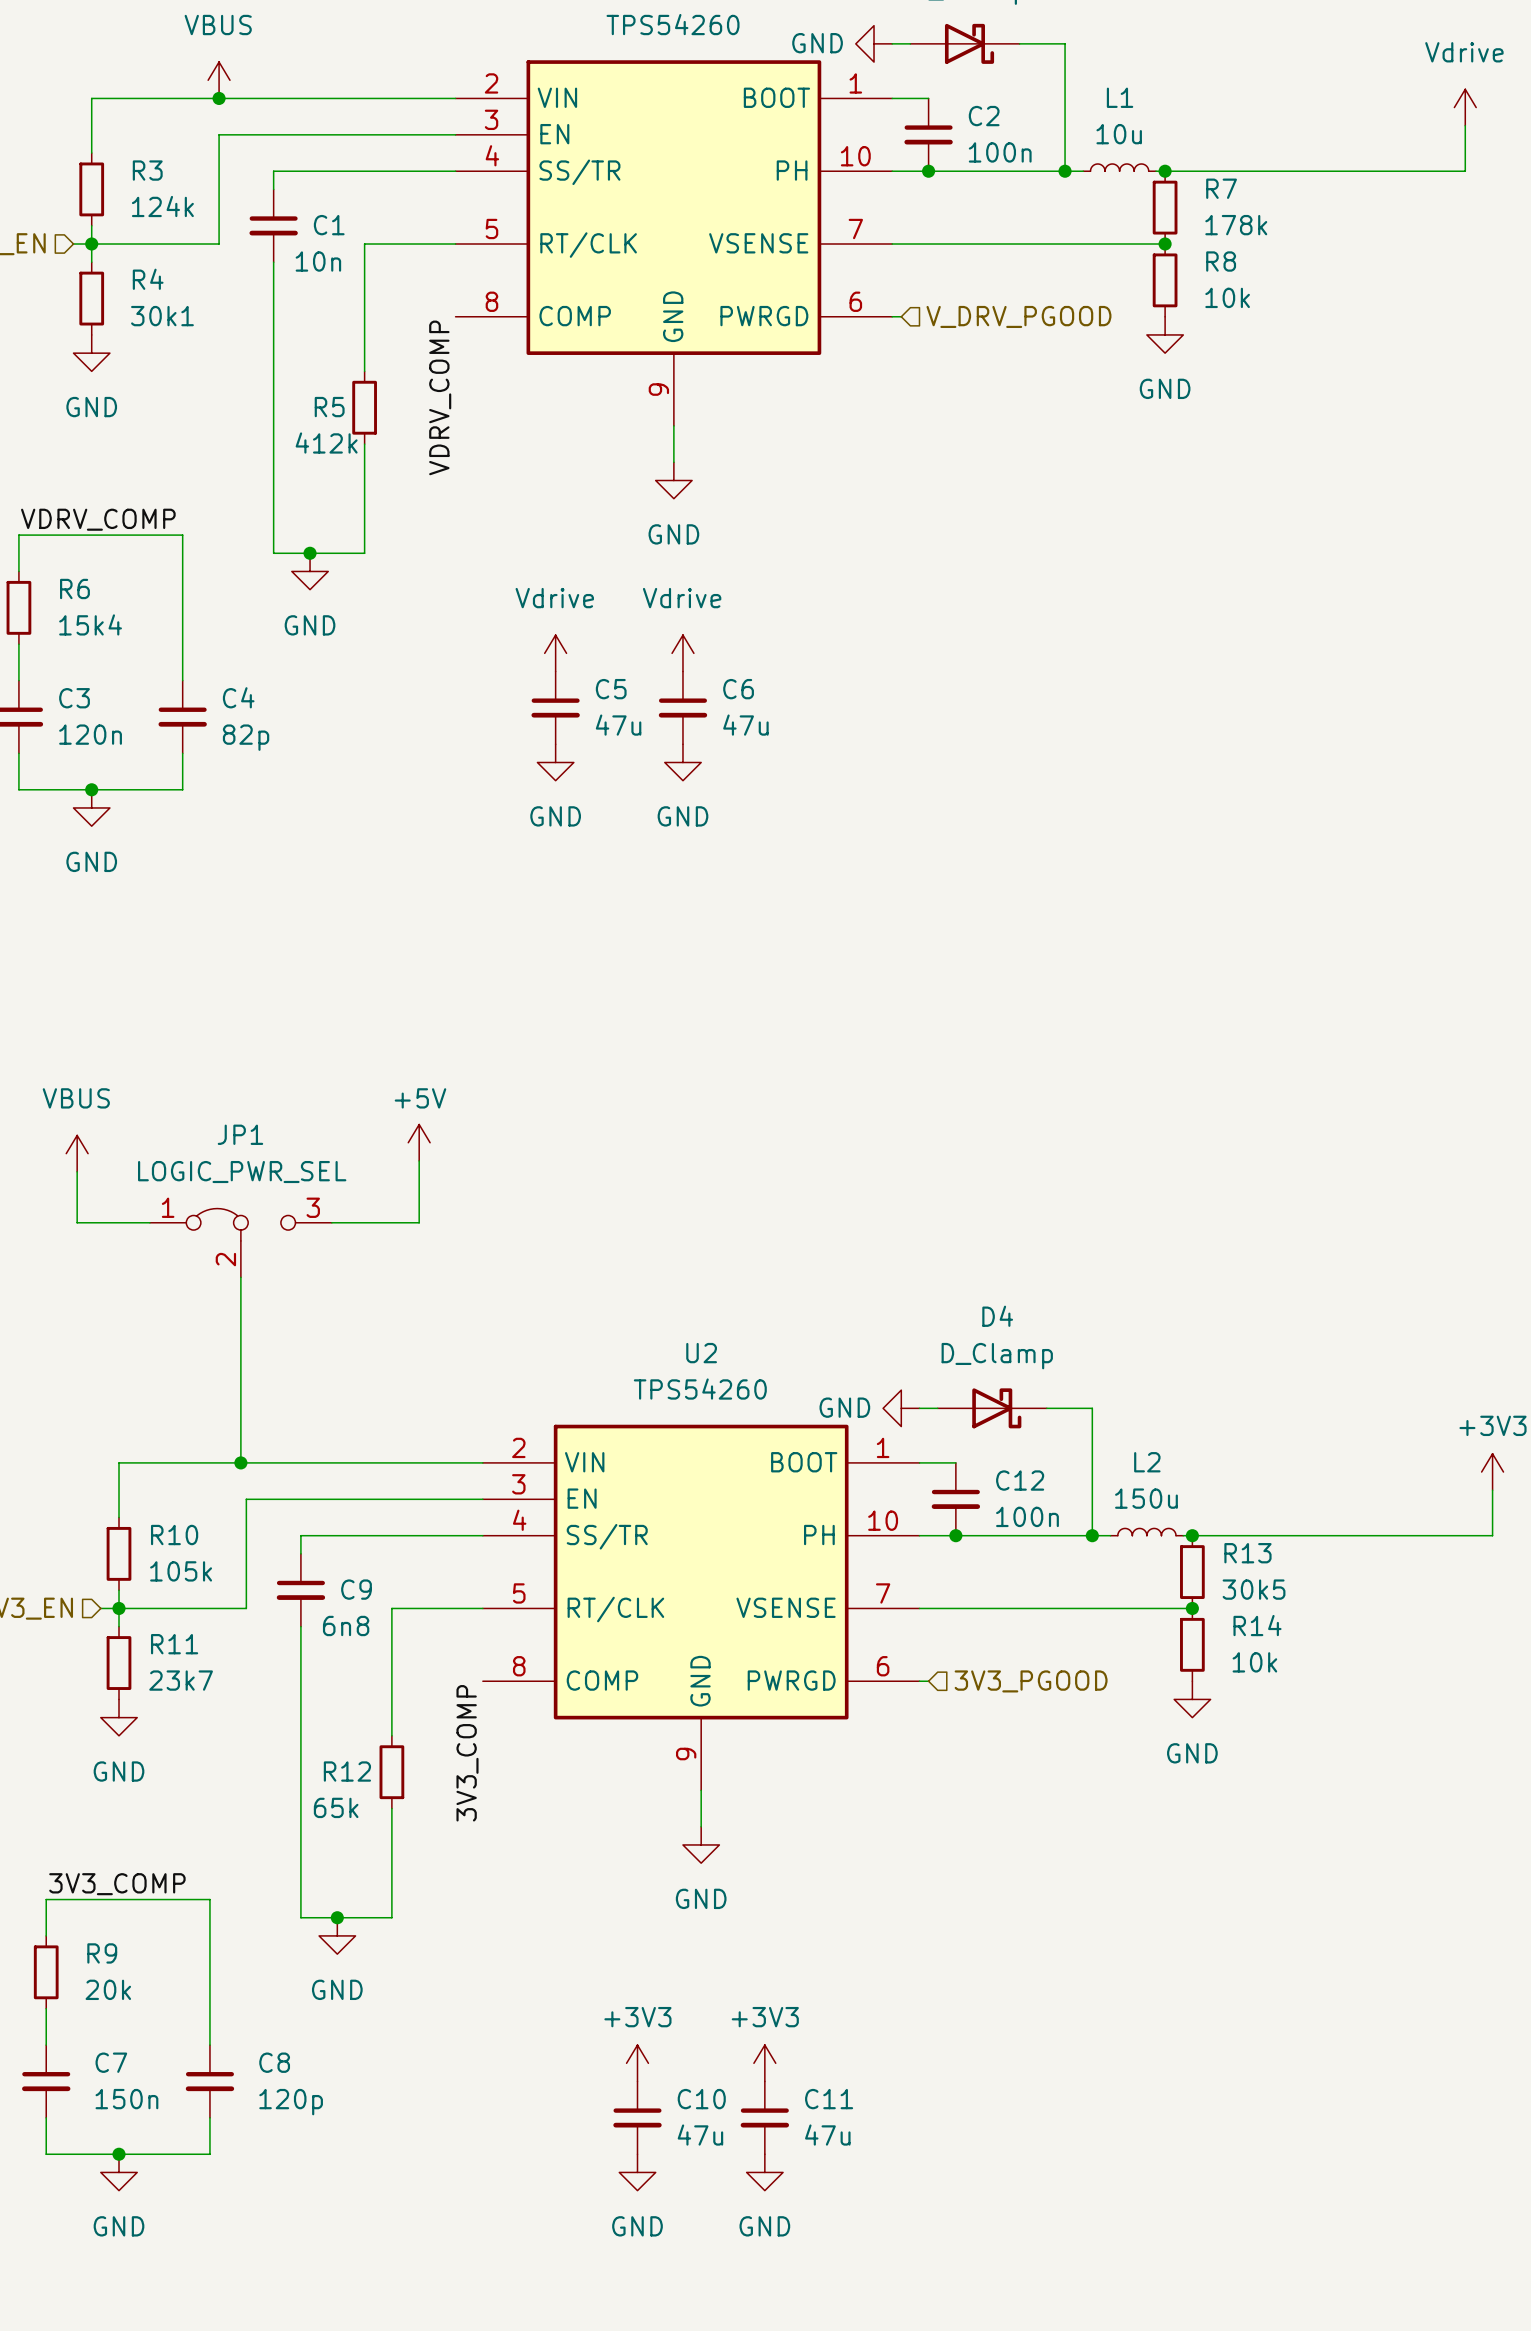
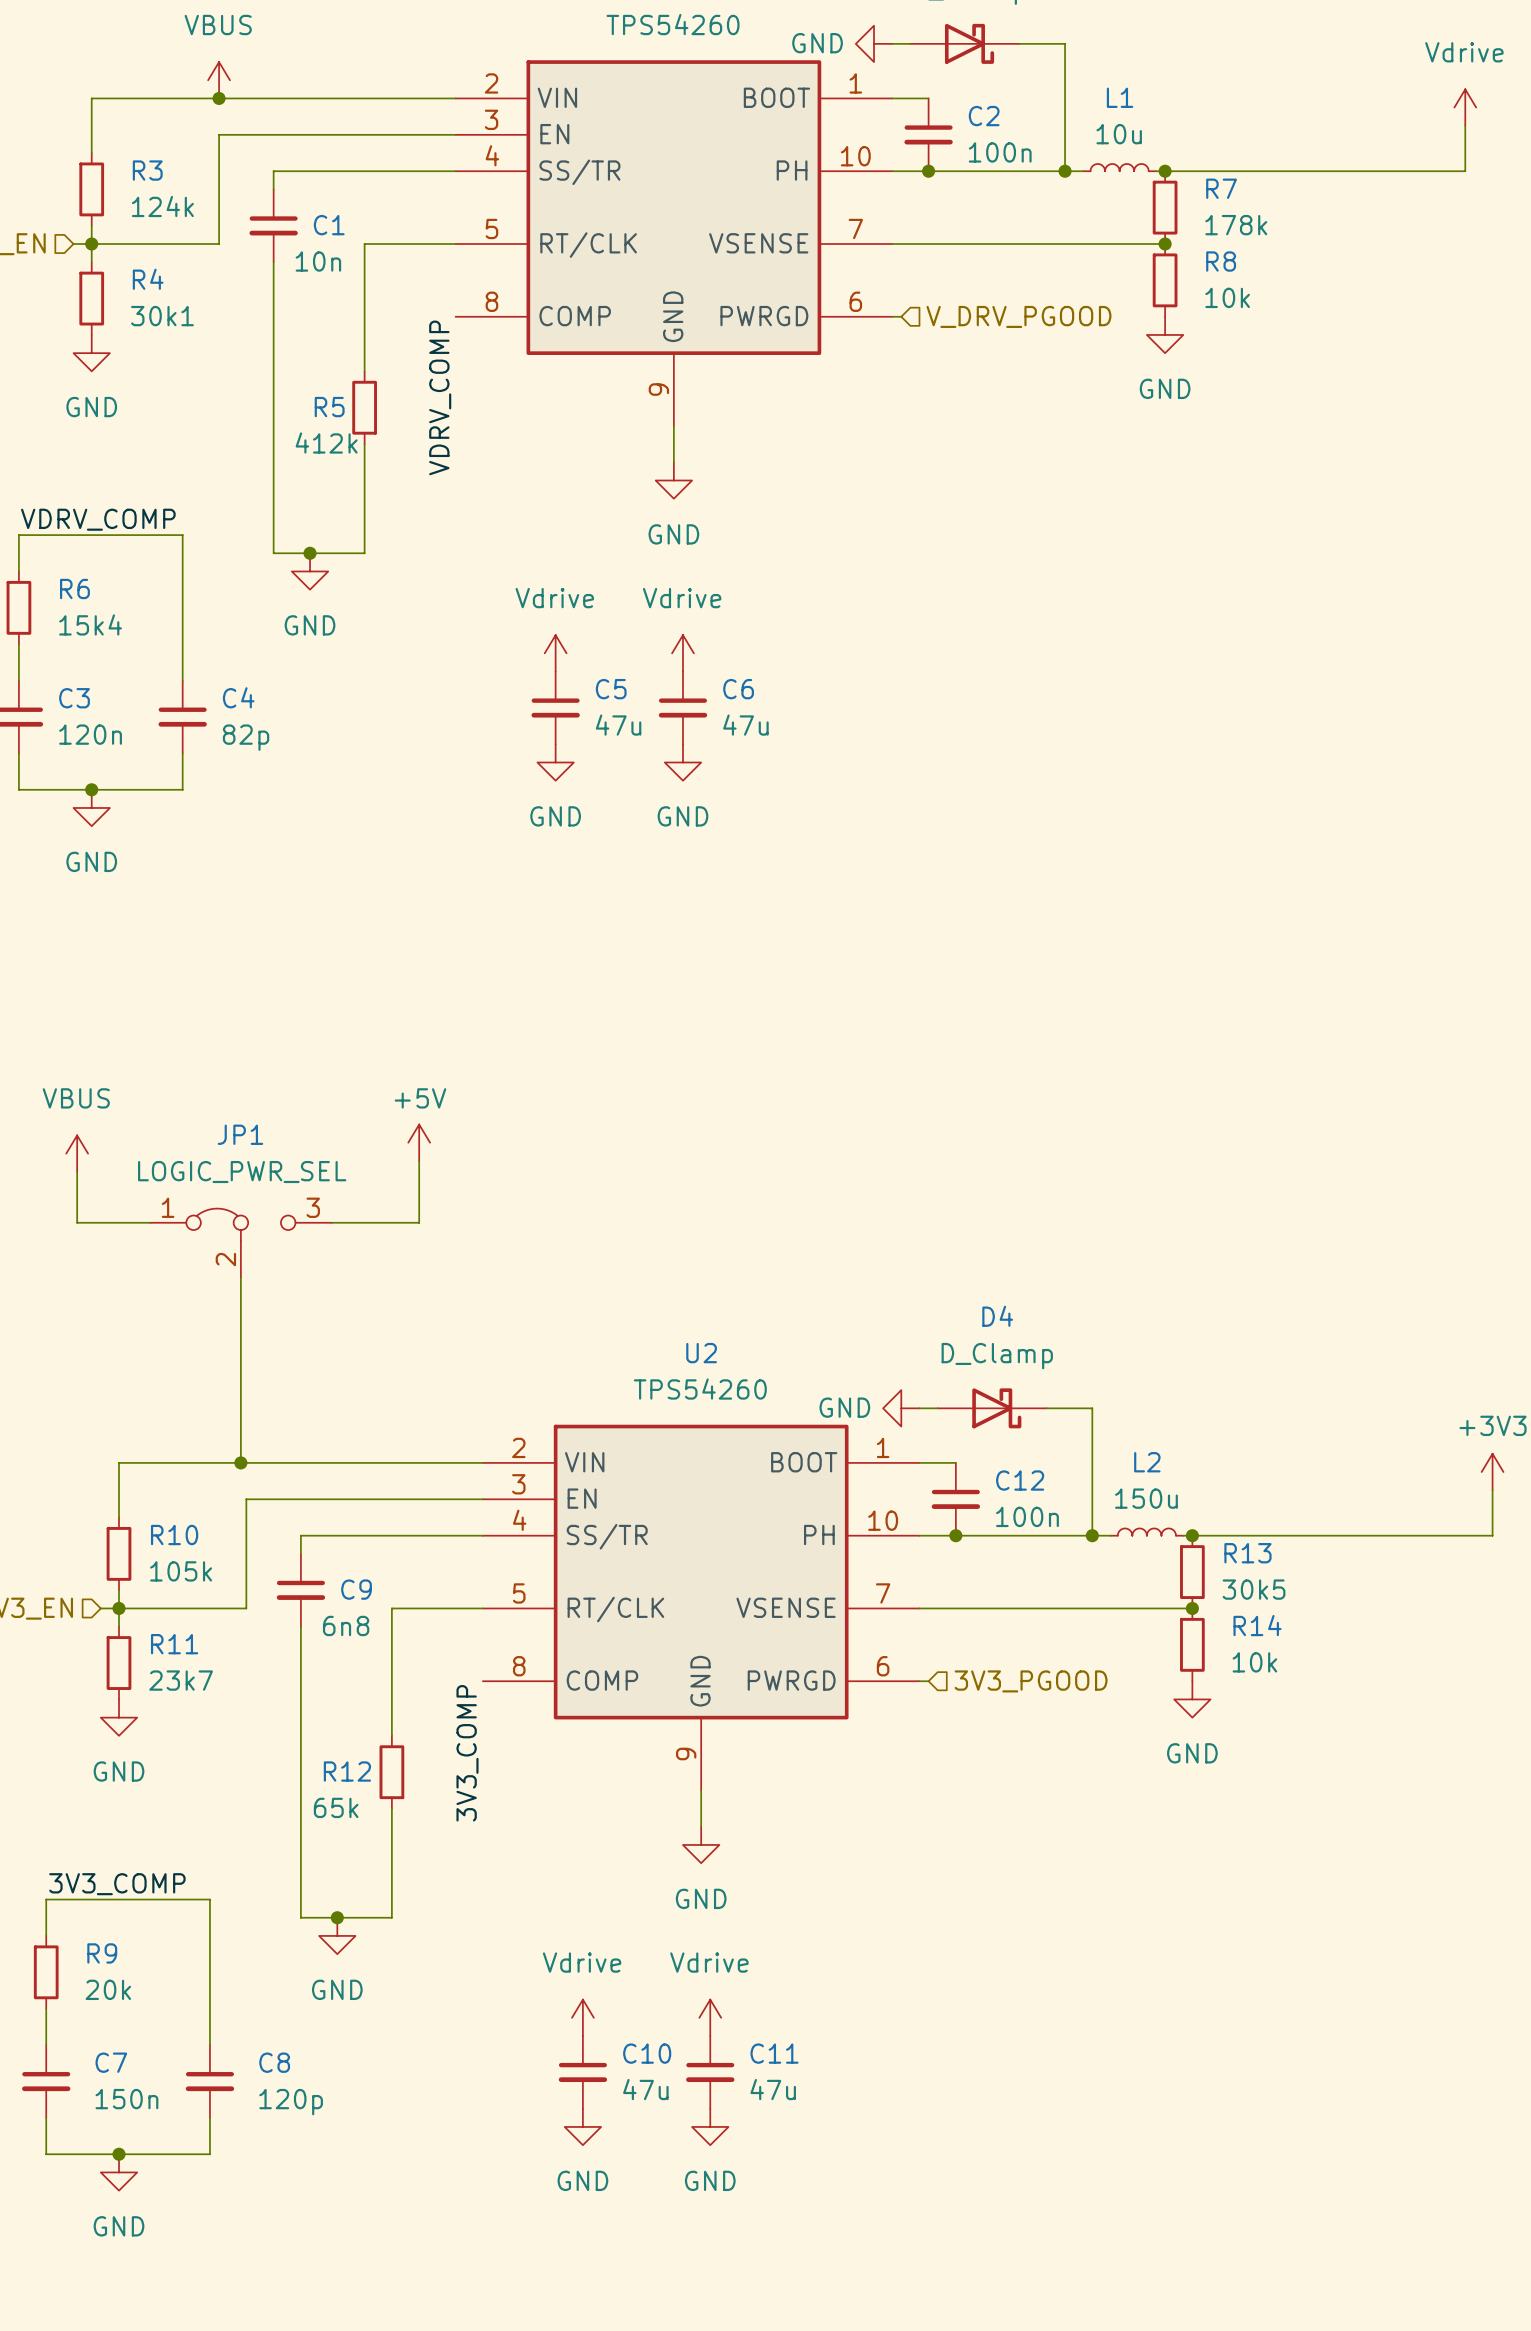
power symbol: none -> Vdrive (582, 2017)
power symbol: none -> Vdrive (710, 2017)
power symbol: +3V3 (637, 2063) -> none
power symbol: +3V3 (764, 2063) -> none
C10 position: (637, 2117) -> (582, 2072)
C11 position: (764, 2117) -> (710, 2072)
power symbol: none -> GND (582, 2126)
power symbol: none -> GND (710, 2126)
power symbol: GND (637, 2172) -> none
power symbol: GND (764, 2172) -> none

